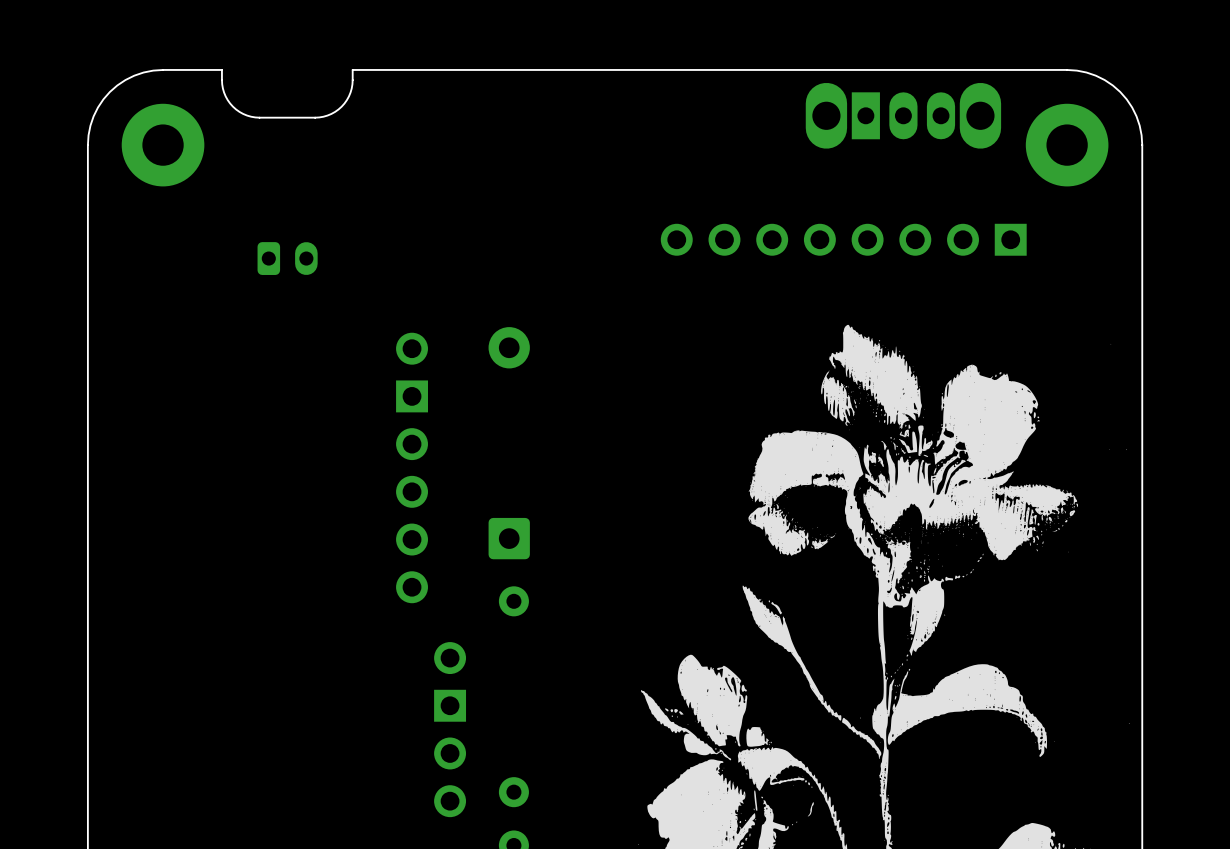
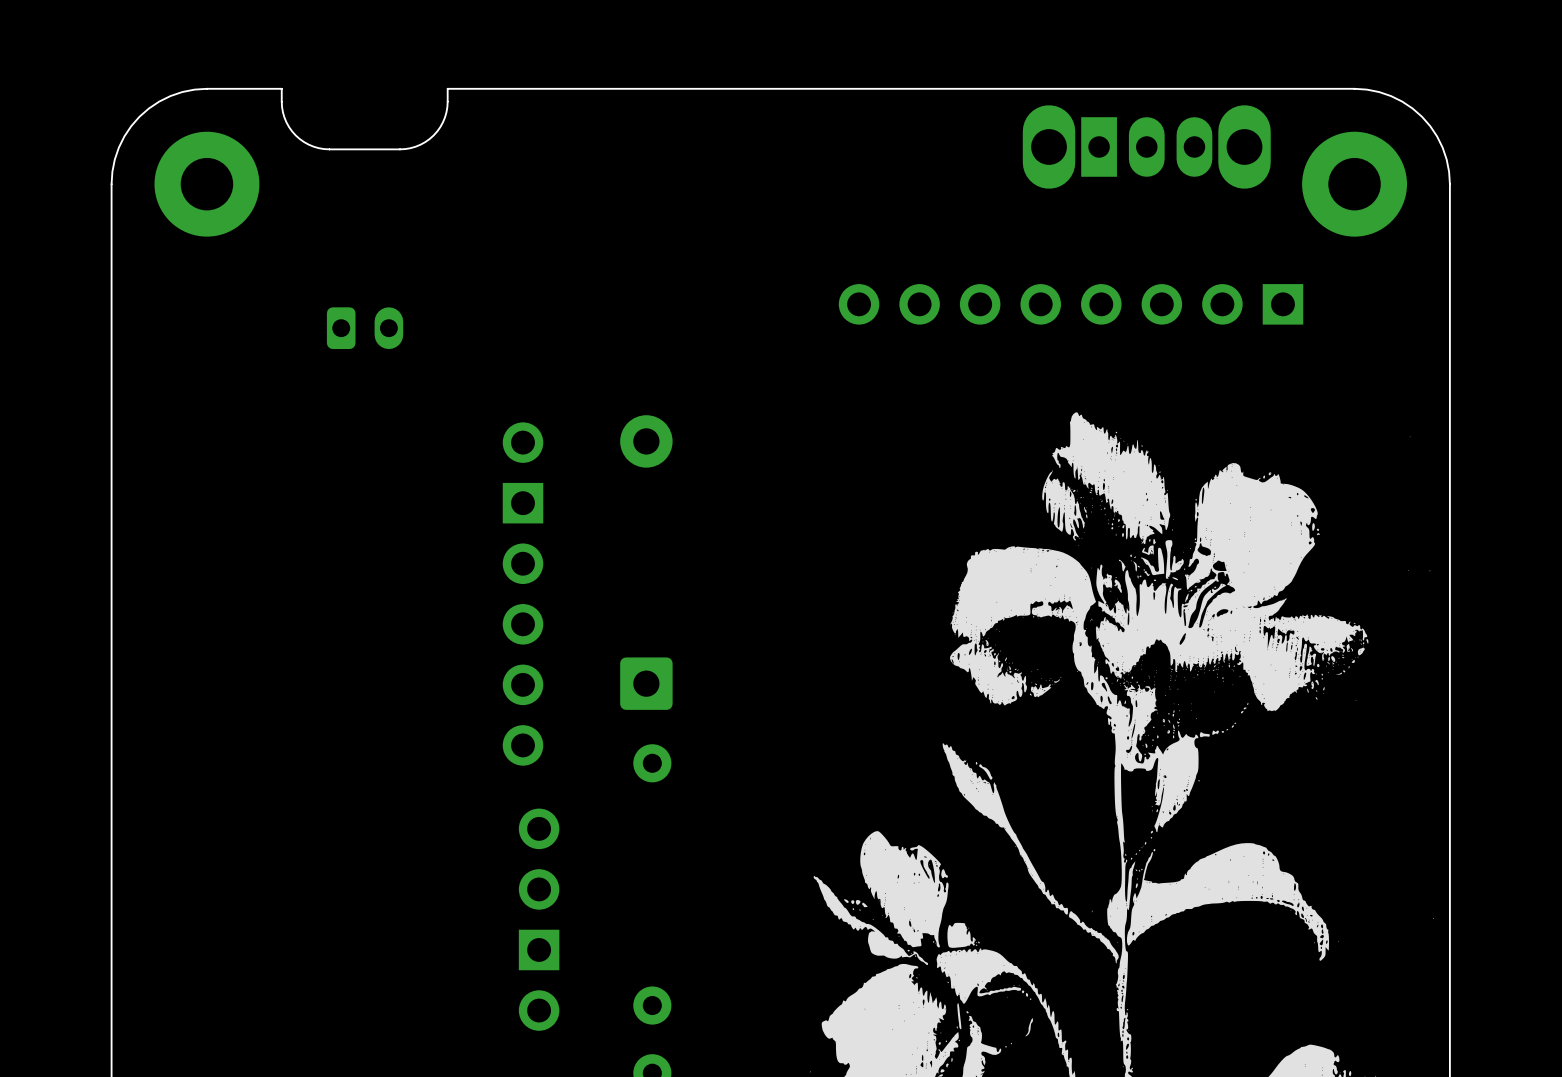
part rotation: 0° (450, 729) -> 180° (539, 919)

